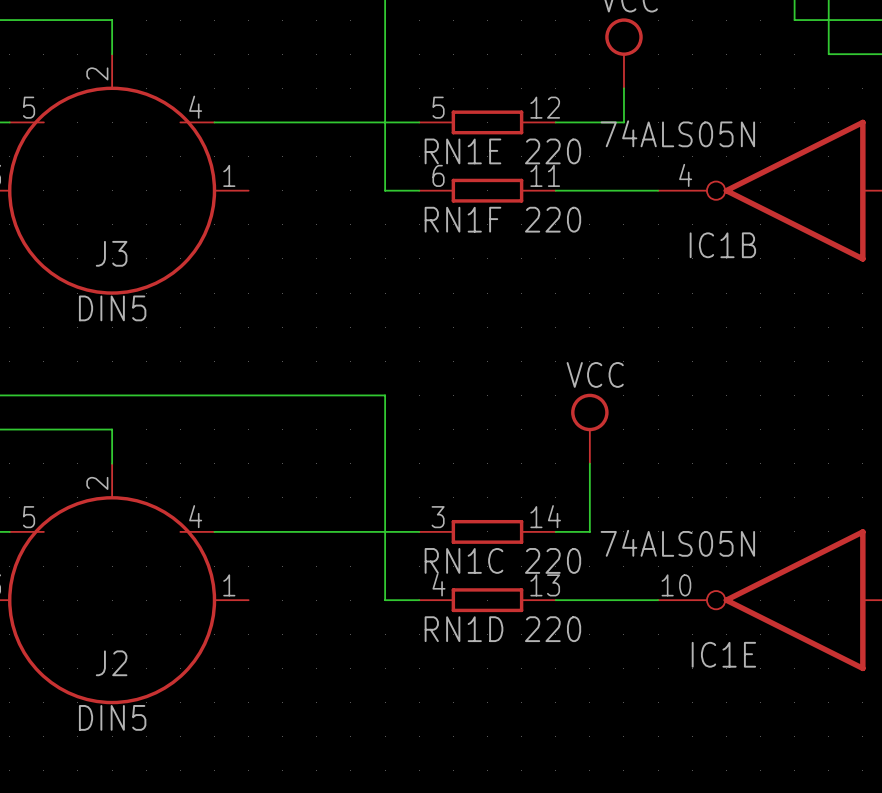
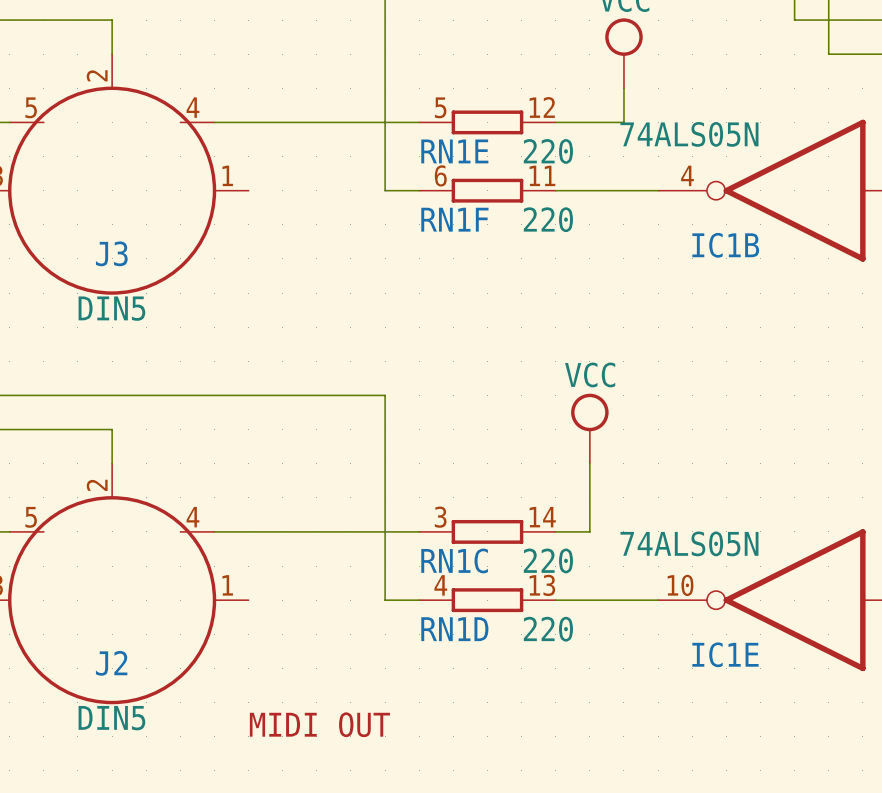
text: none -> MIDI OUT (319, 724)

